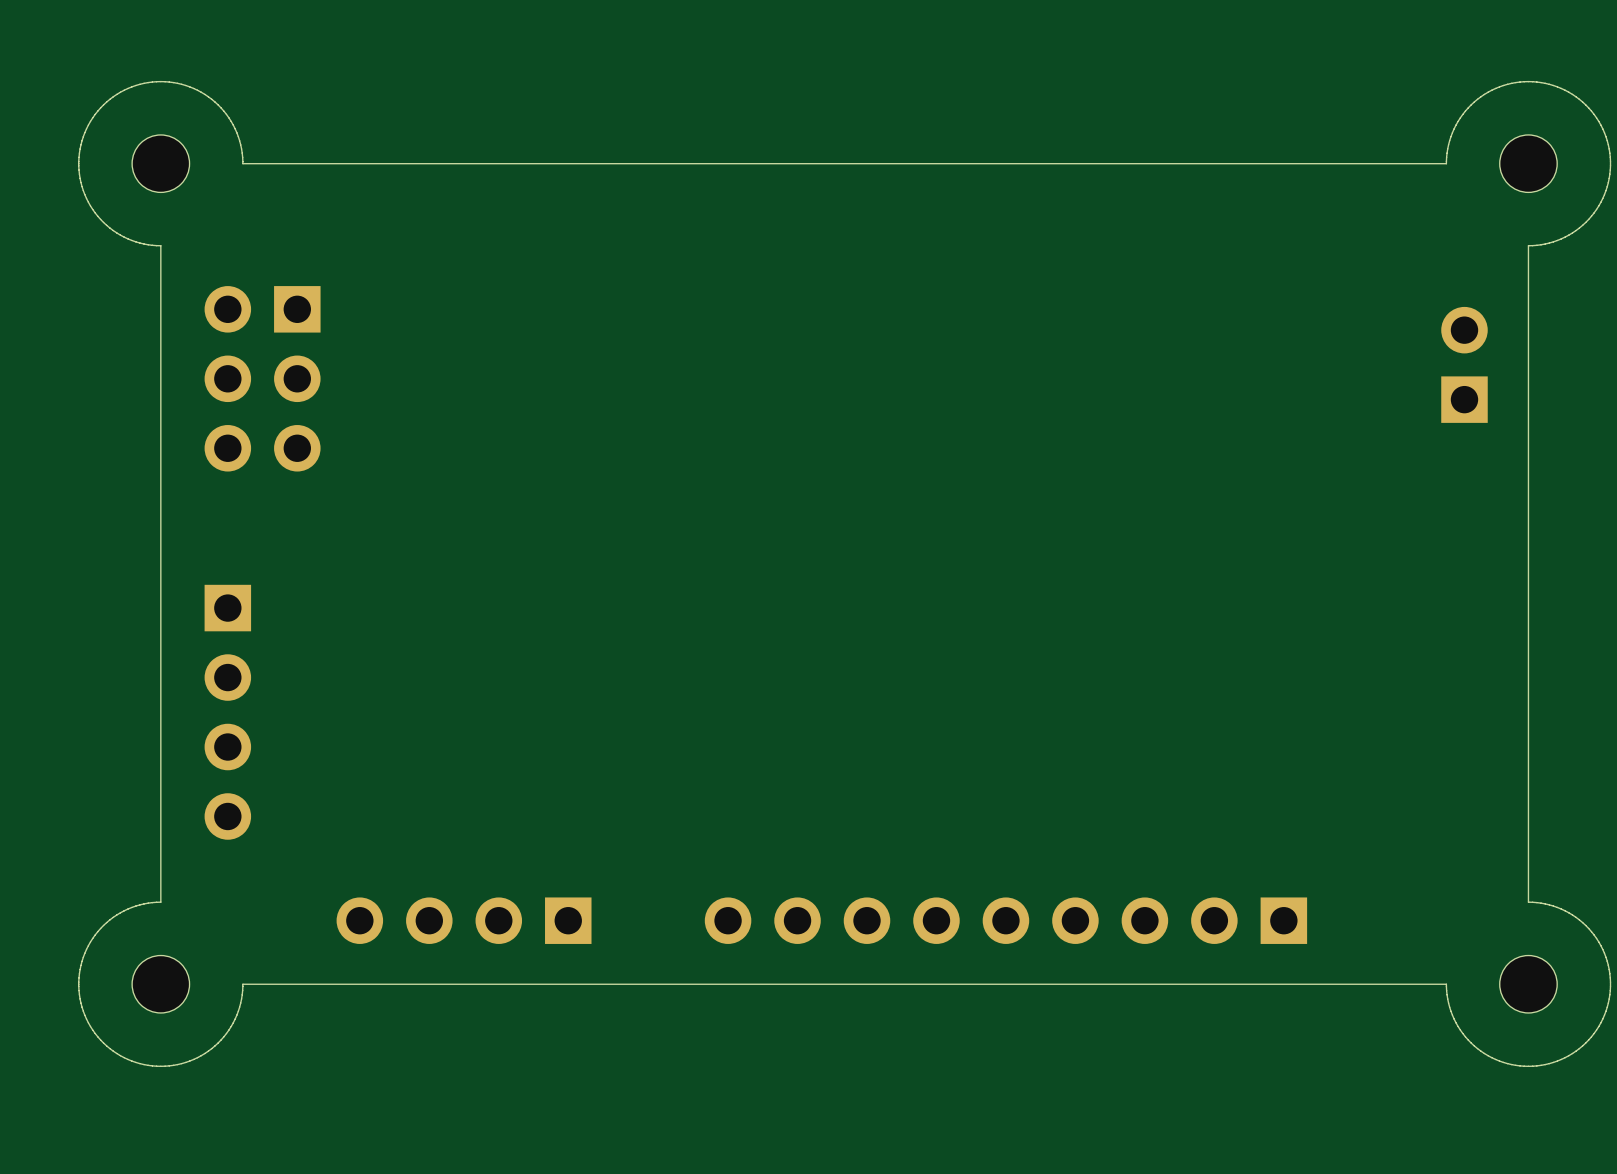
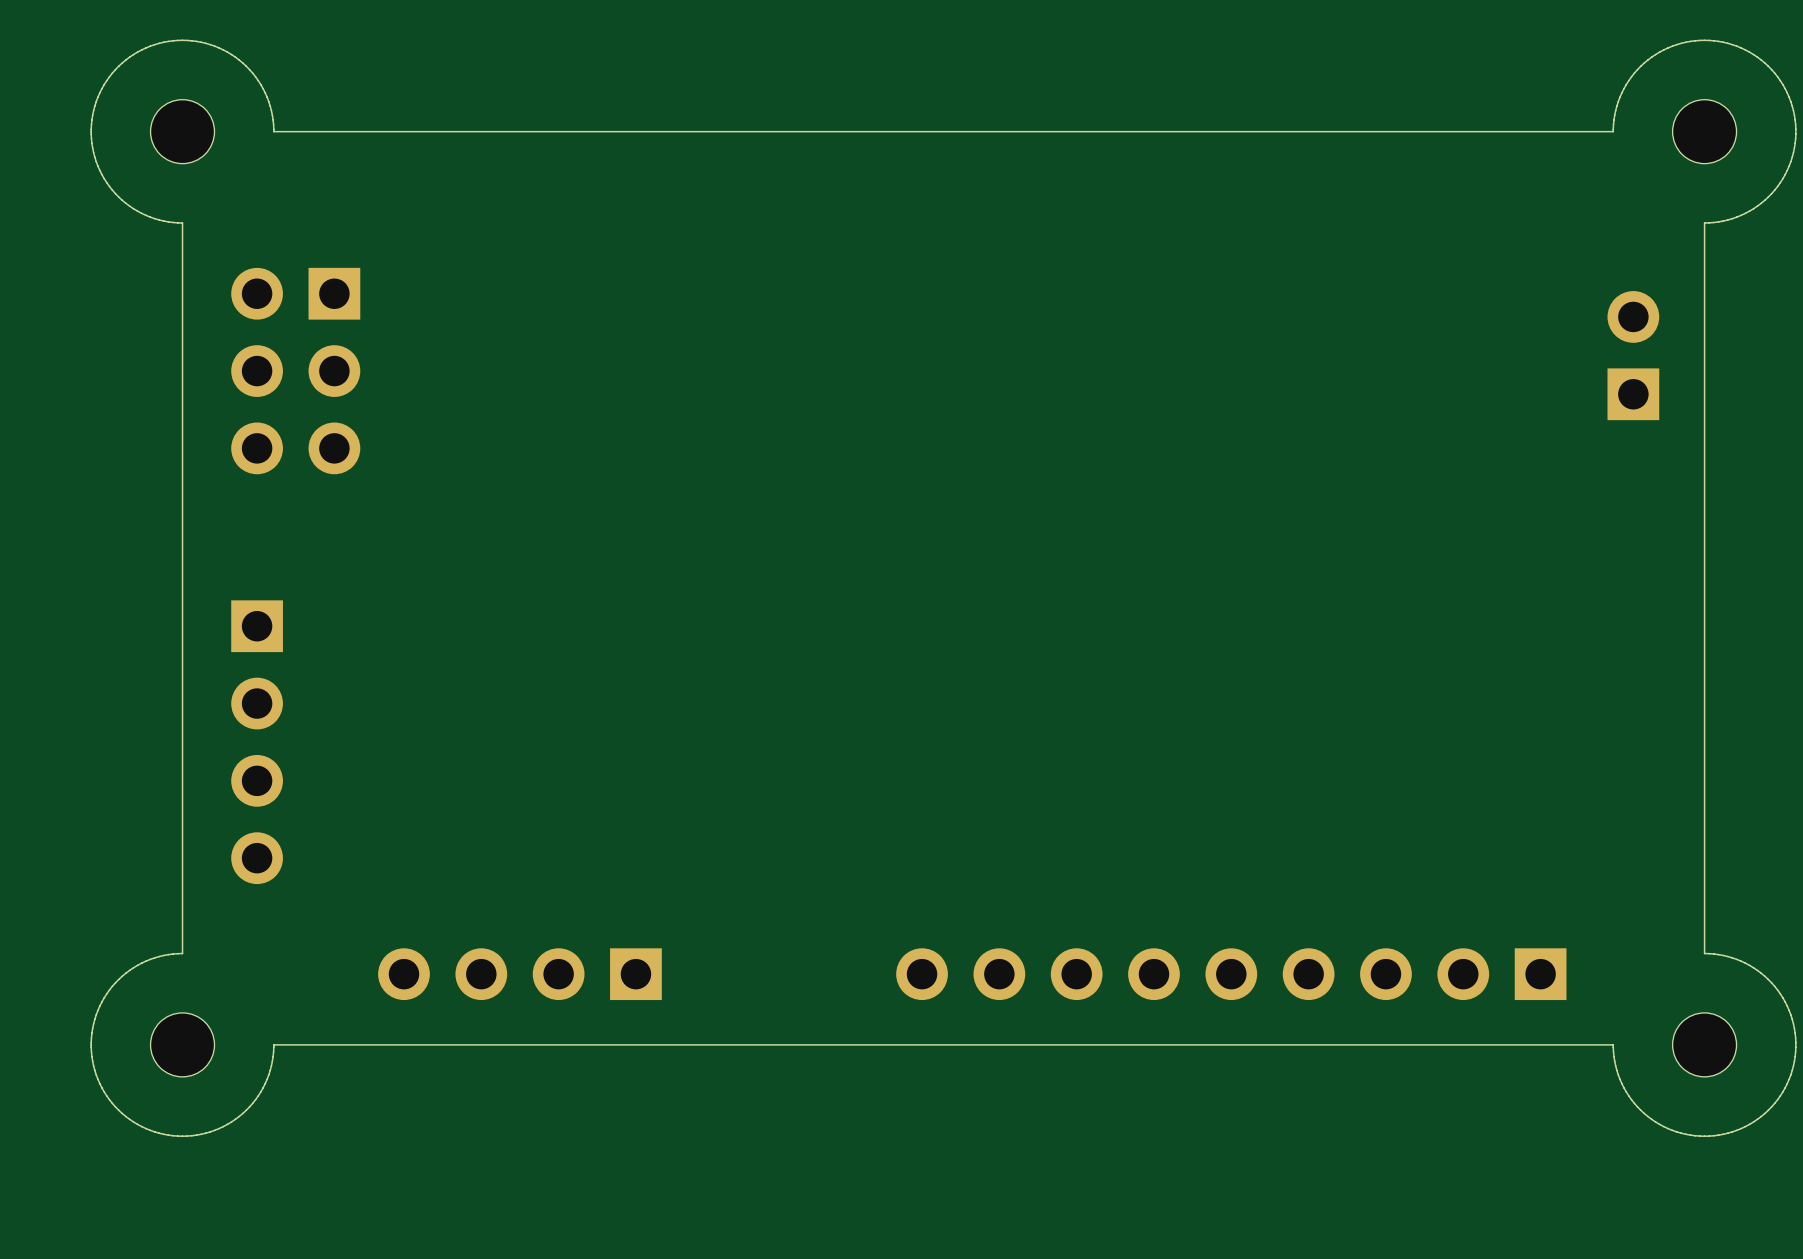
part position: (1005, 920) -> (1231, 974)

